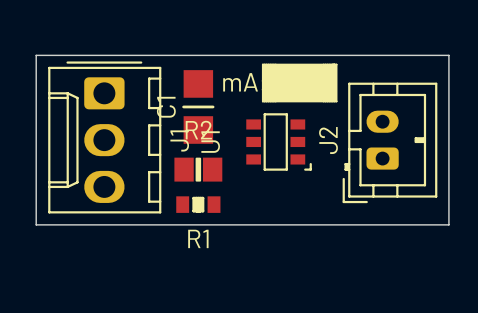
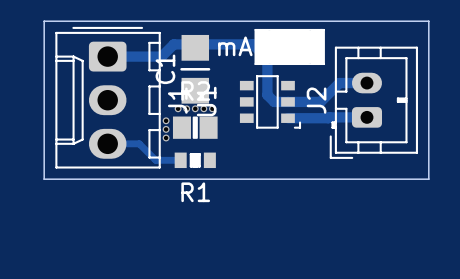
track: none -> (107, 56) (161, 56) (173, 44) (252, 44) (267, 59) (267, 95) (274, 101) (320, 101) (339, 83) (366, 83)
via: none -> (178, 108)
via: none -> (186, 108)
via: none -> (195, 108)
via: none -> (203, 108)
via: none -> (212, 108)
track: none -> (366, 117) (288, 118)
via: none -> (166, 120)
via: none -> (166, 129)
via: none -> (166, 137)
track: none -> (107, 143) (139, 143) (155, 160) (180, 160)

